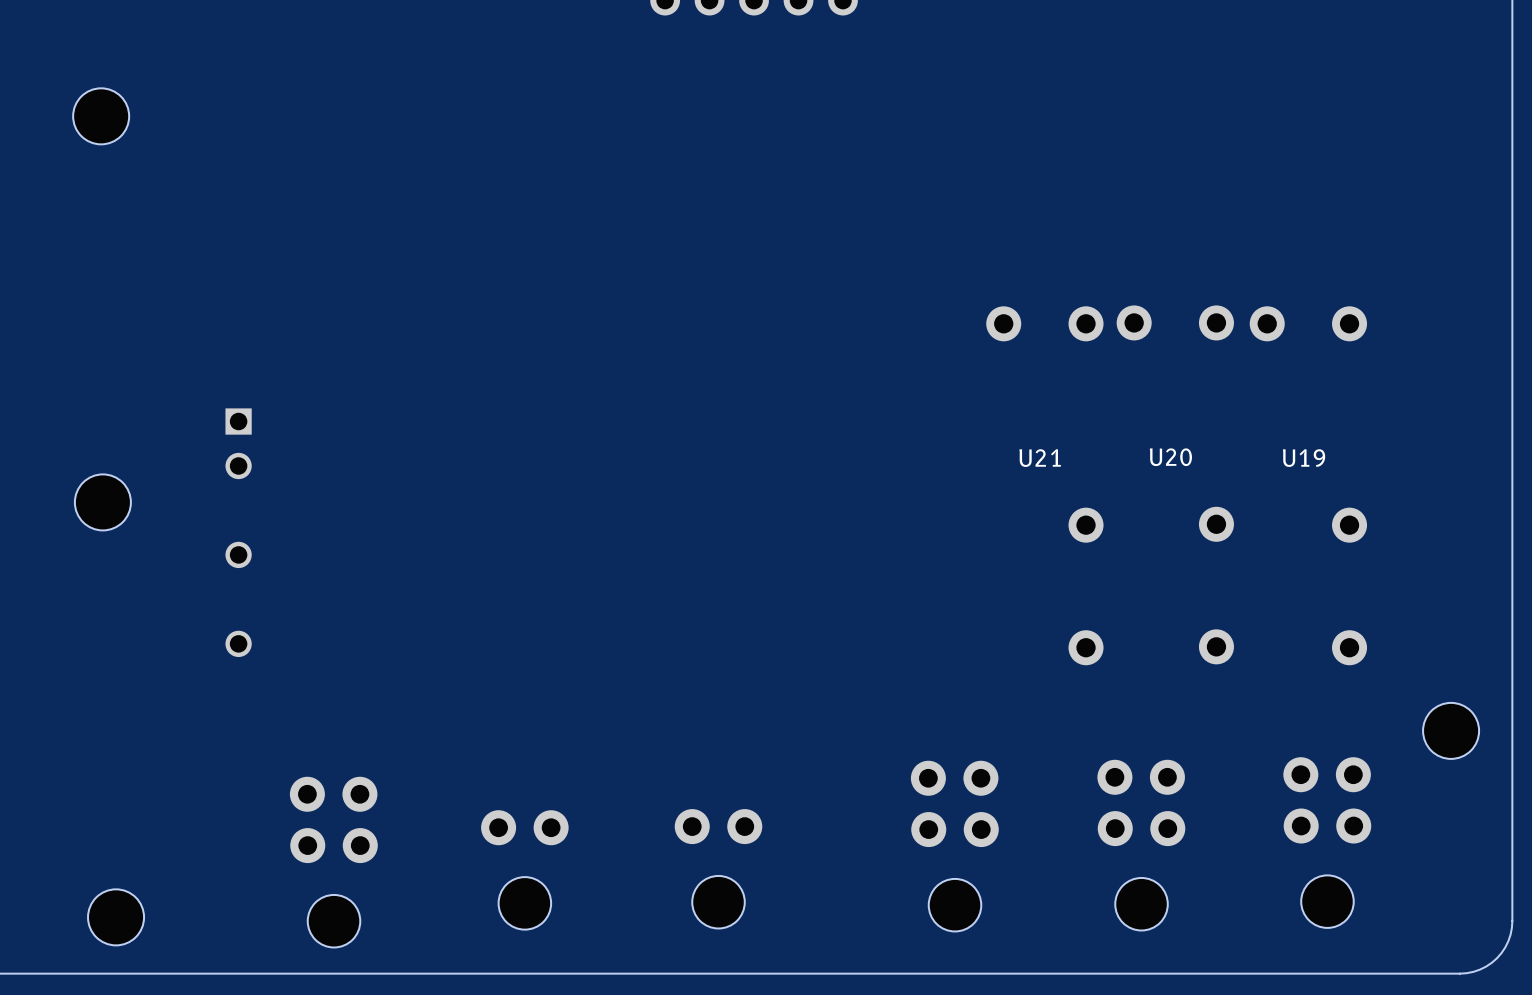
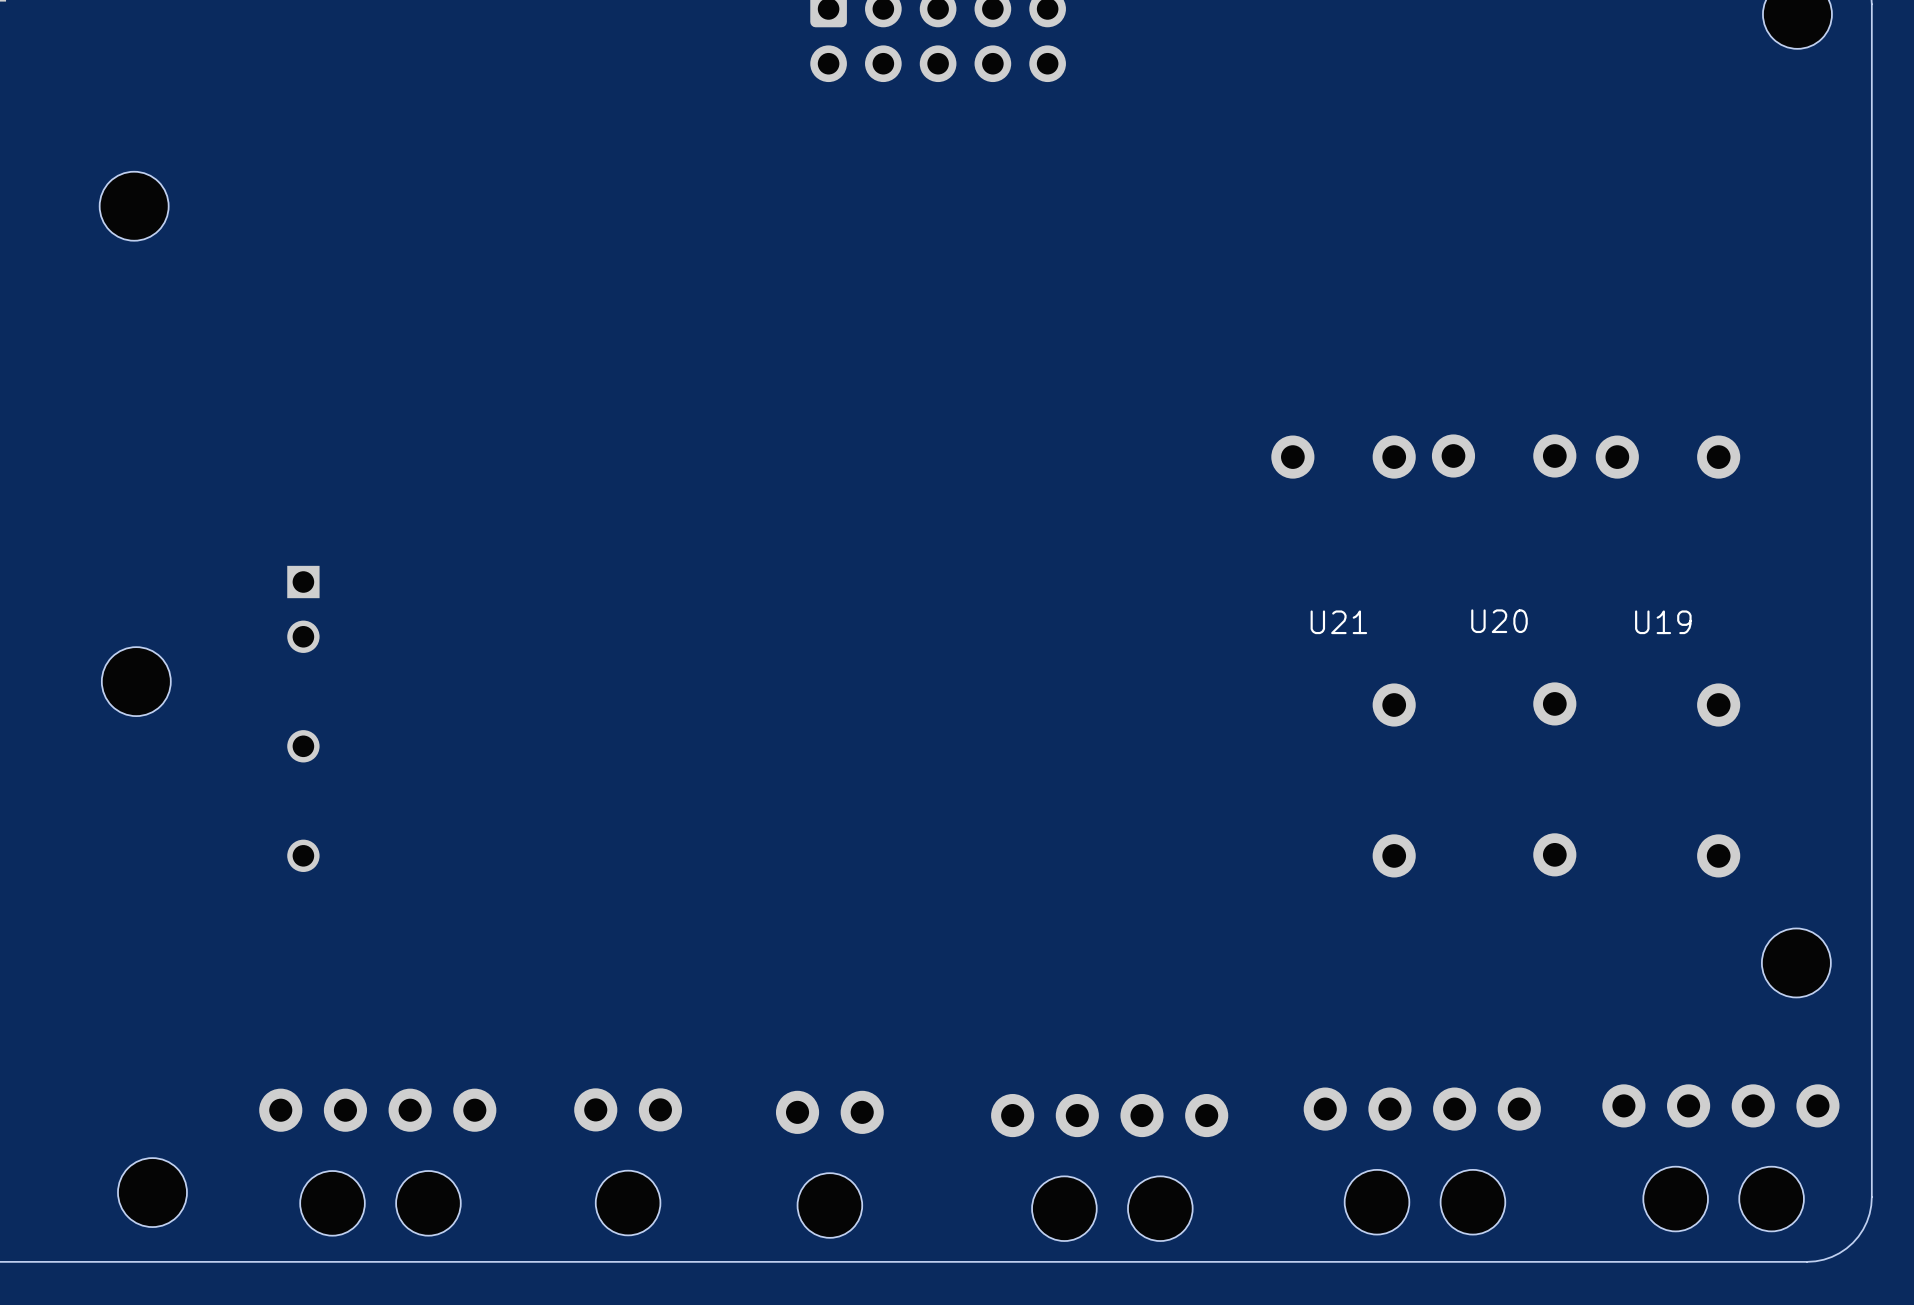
U20 position: (1175, 484) -> (1504, 655)
U21 position: (1044, 485) -> (1343, 656)
U19 position: (1308, 485) -> (1668, 656)
part: (1327, 842) -> none
part: (1141, 845) -> none
part: (954, 846) -> none
part: (333, 862) -> none
part position: (718, 868) -> (829, 1164)
part position: (524, 869) -> (628, 1161)
part: none -> (1720, 1157)
part: none -> (1422, 1161)
part: none -> (377, 1162)
part: none -> (1109, 1167)

